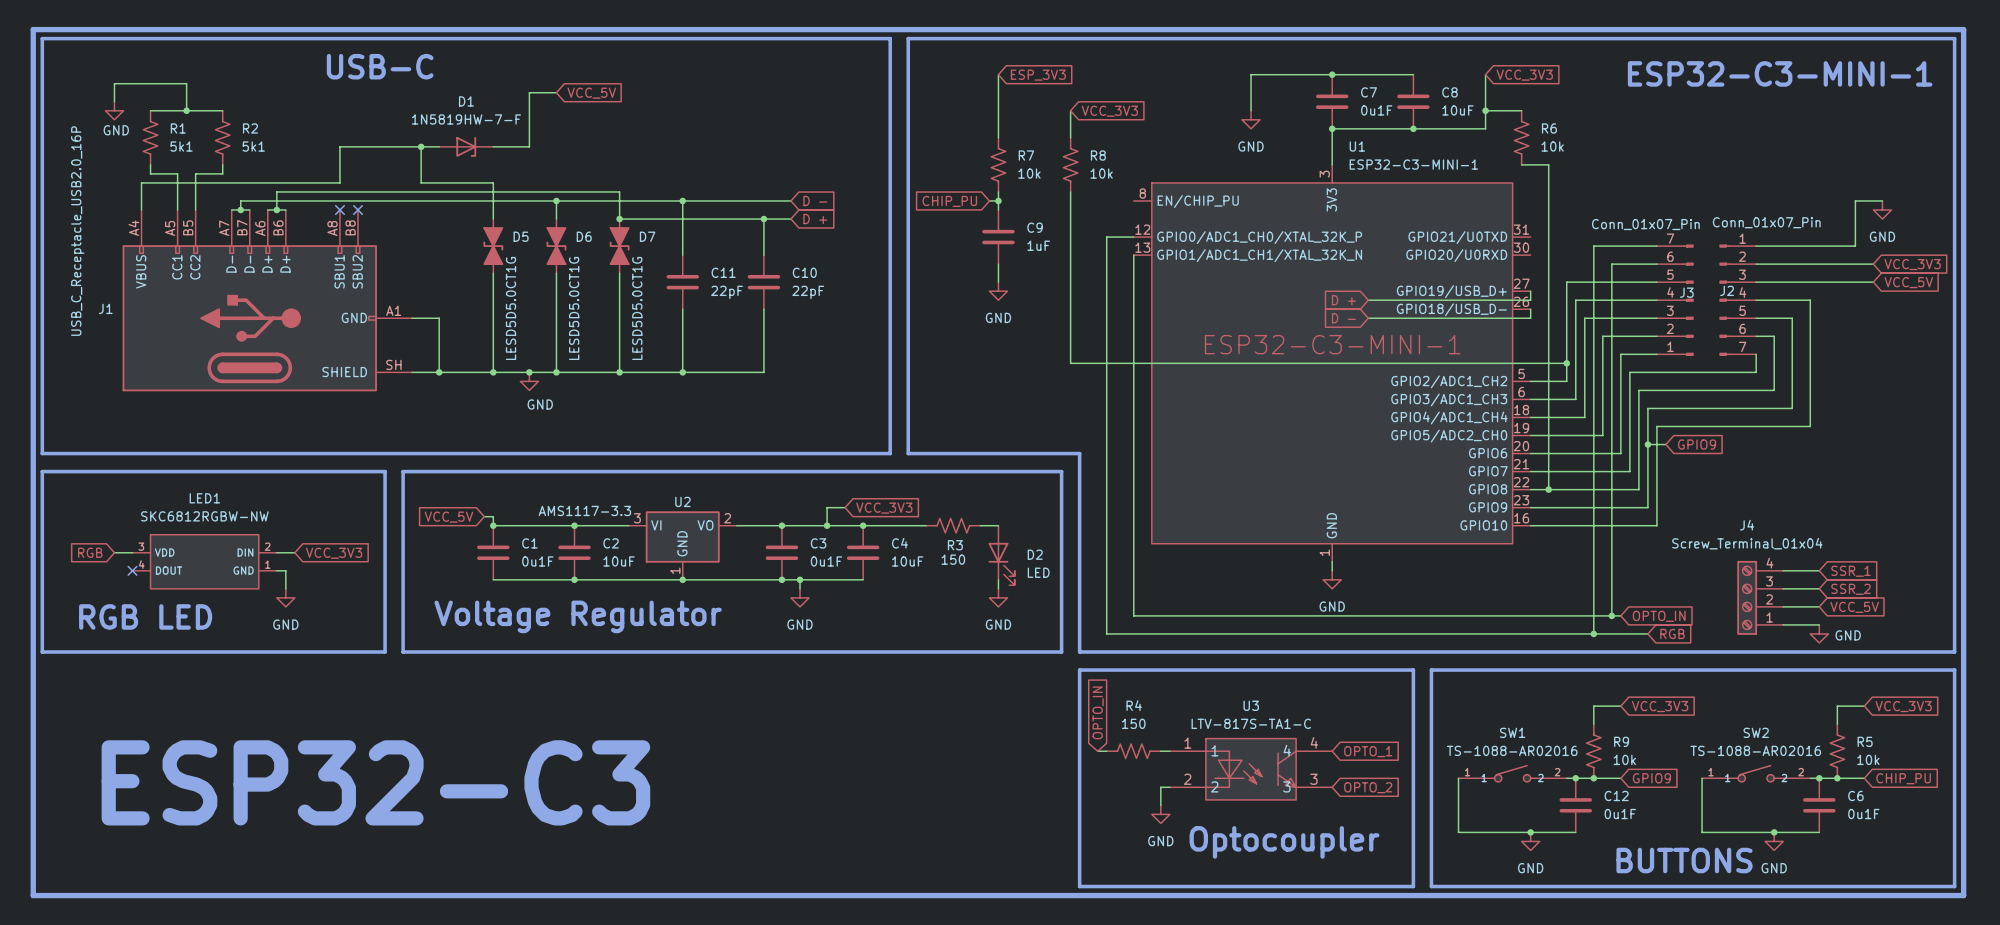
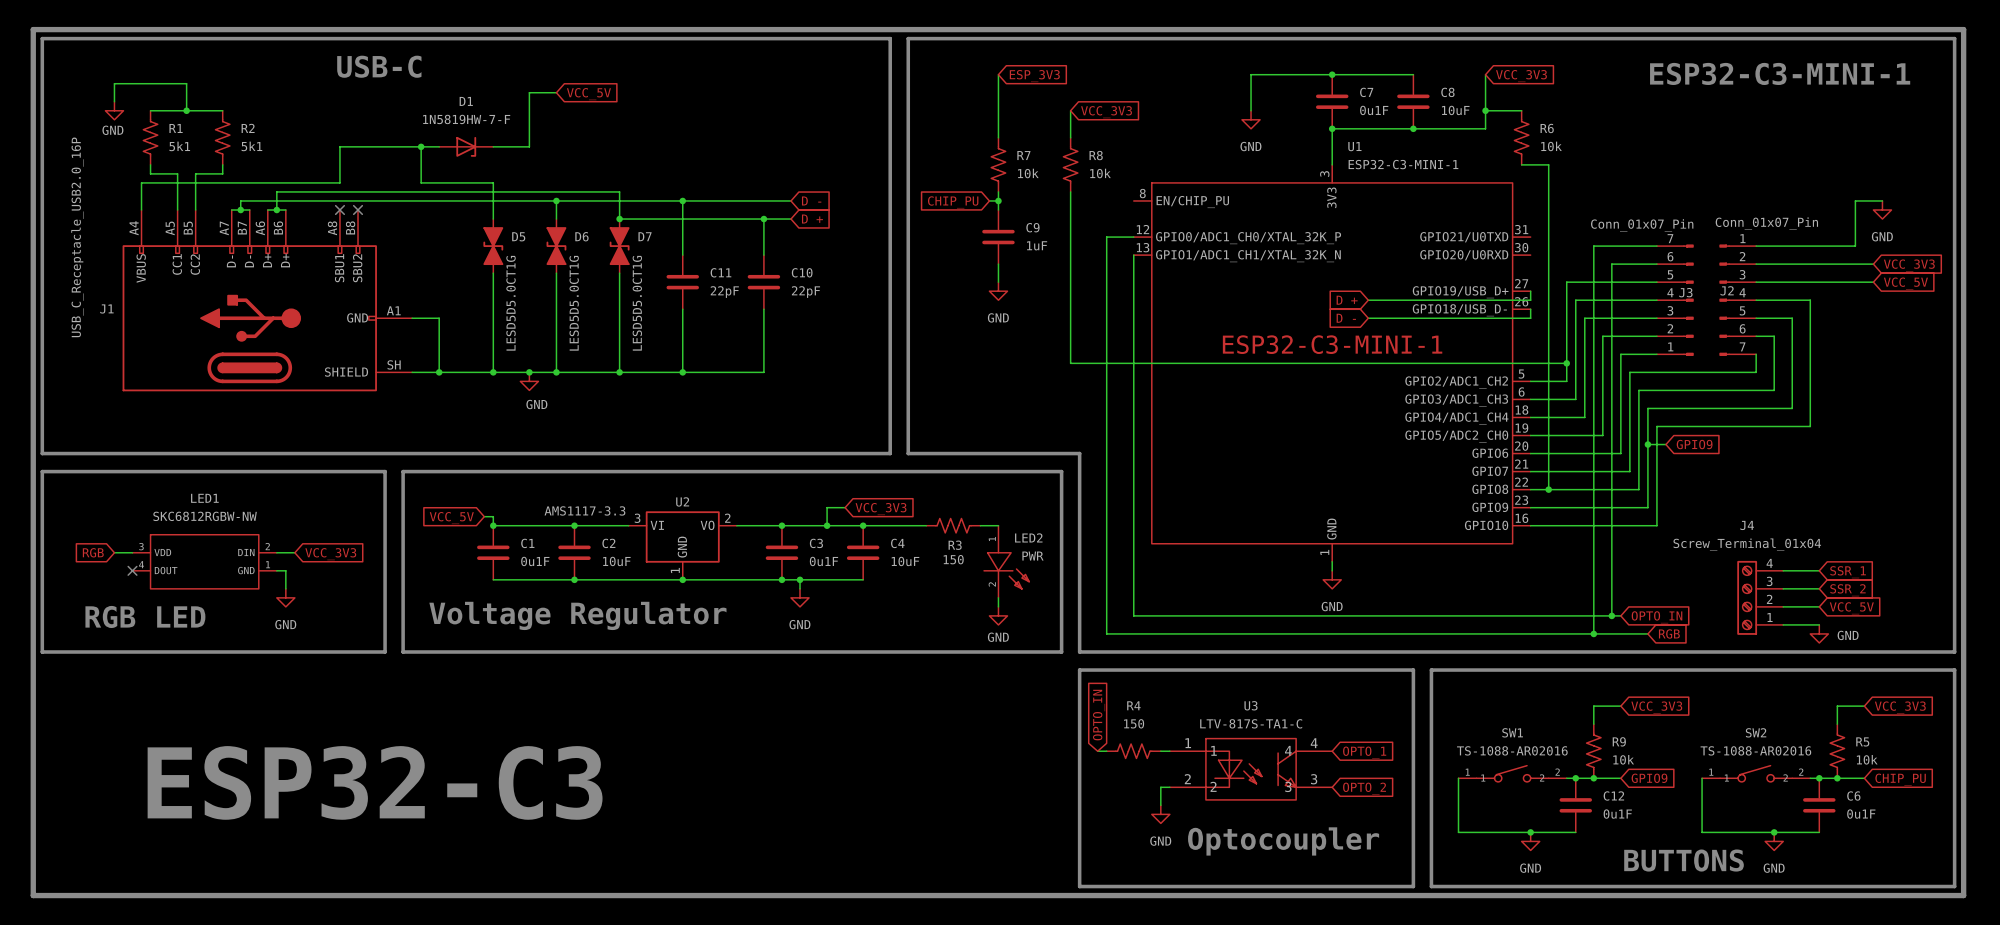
D2: LED (1001, 555) -> none
LED2: none -> PWR (1006, 561)
power symbol position: GND (998, 597) -> GND (998, 615)
power symbol text position: GND (998, 624) -> GND (998, 637)

